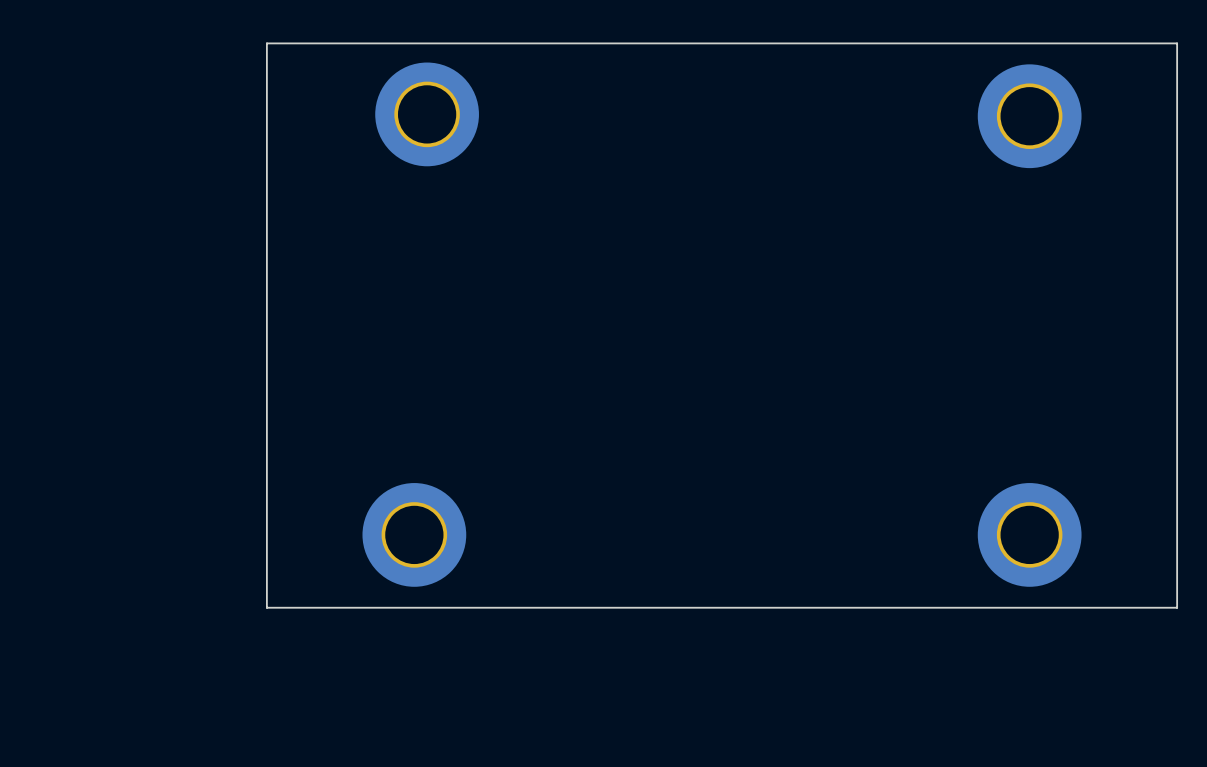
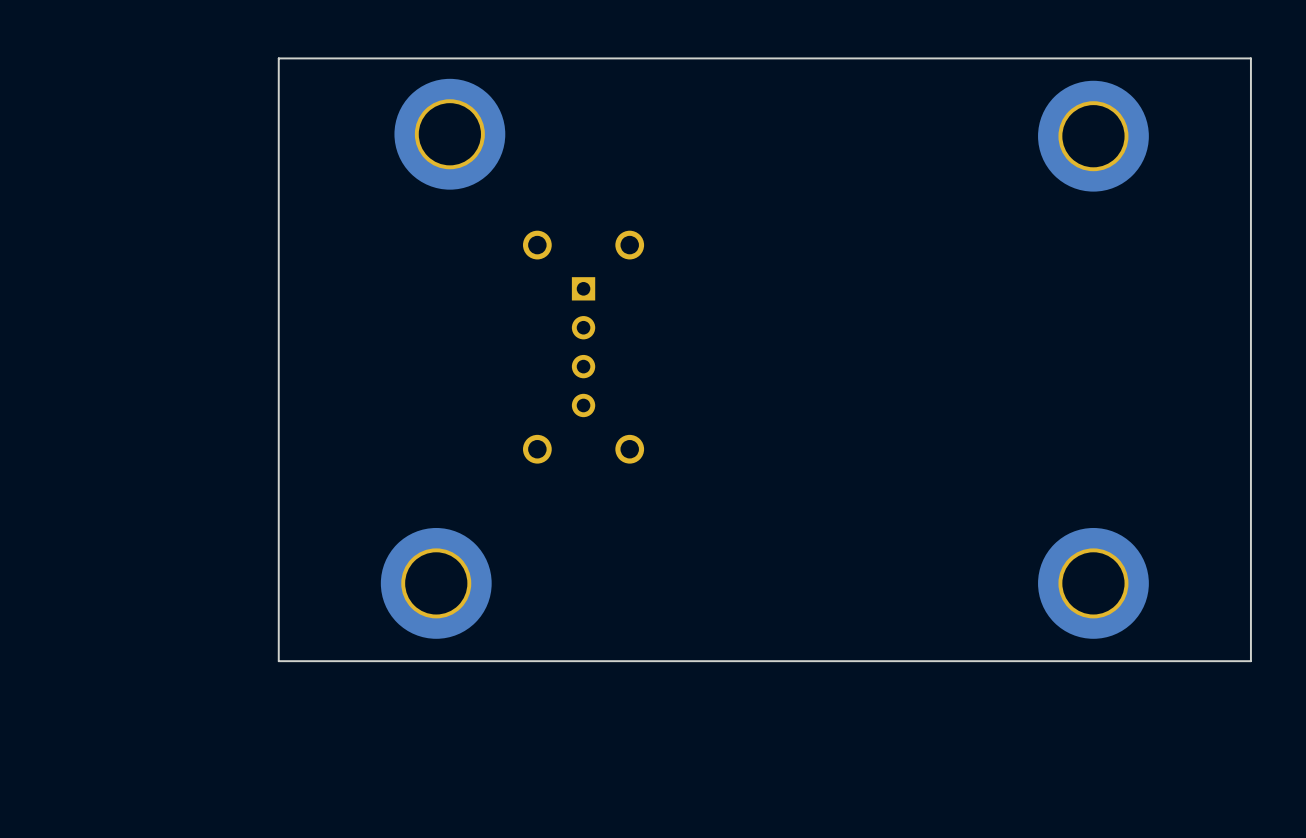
part: none -> (583, 347)

